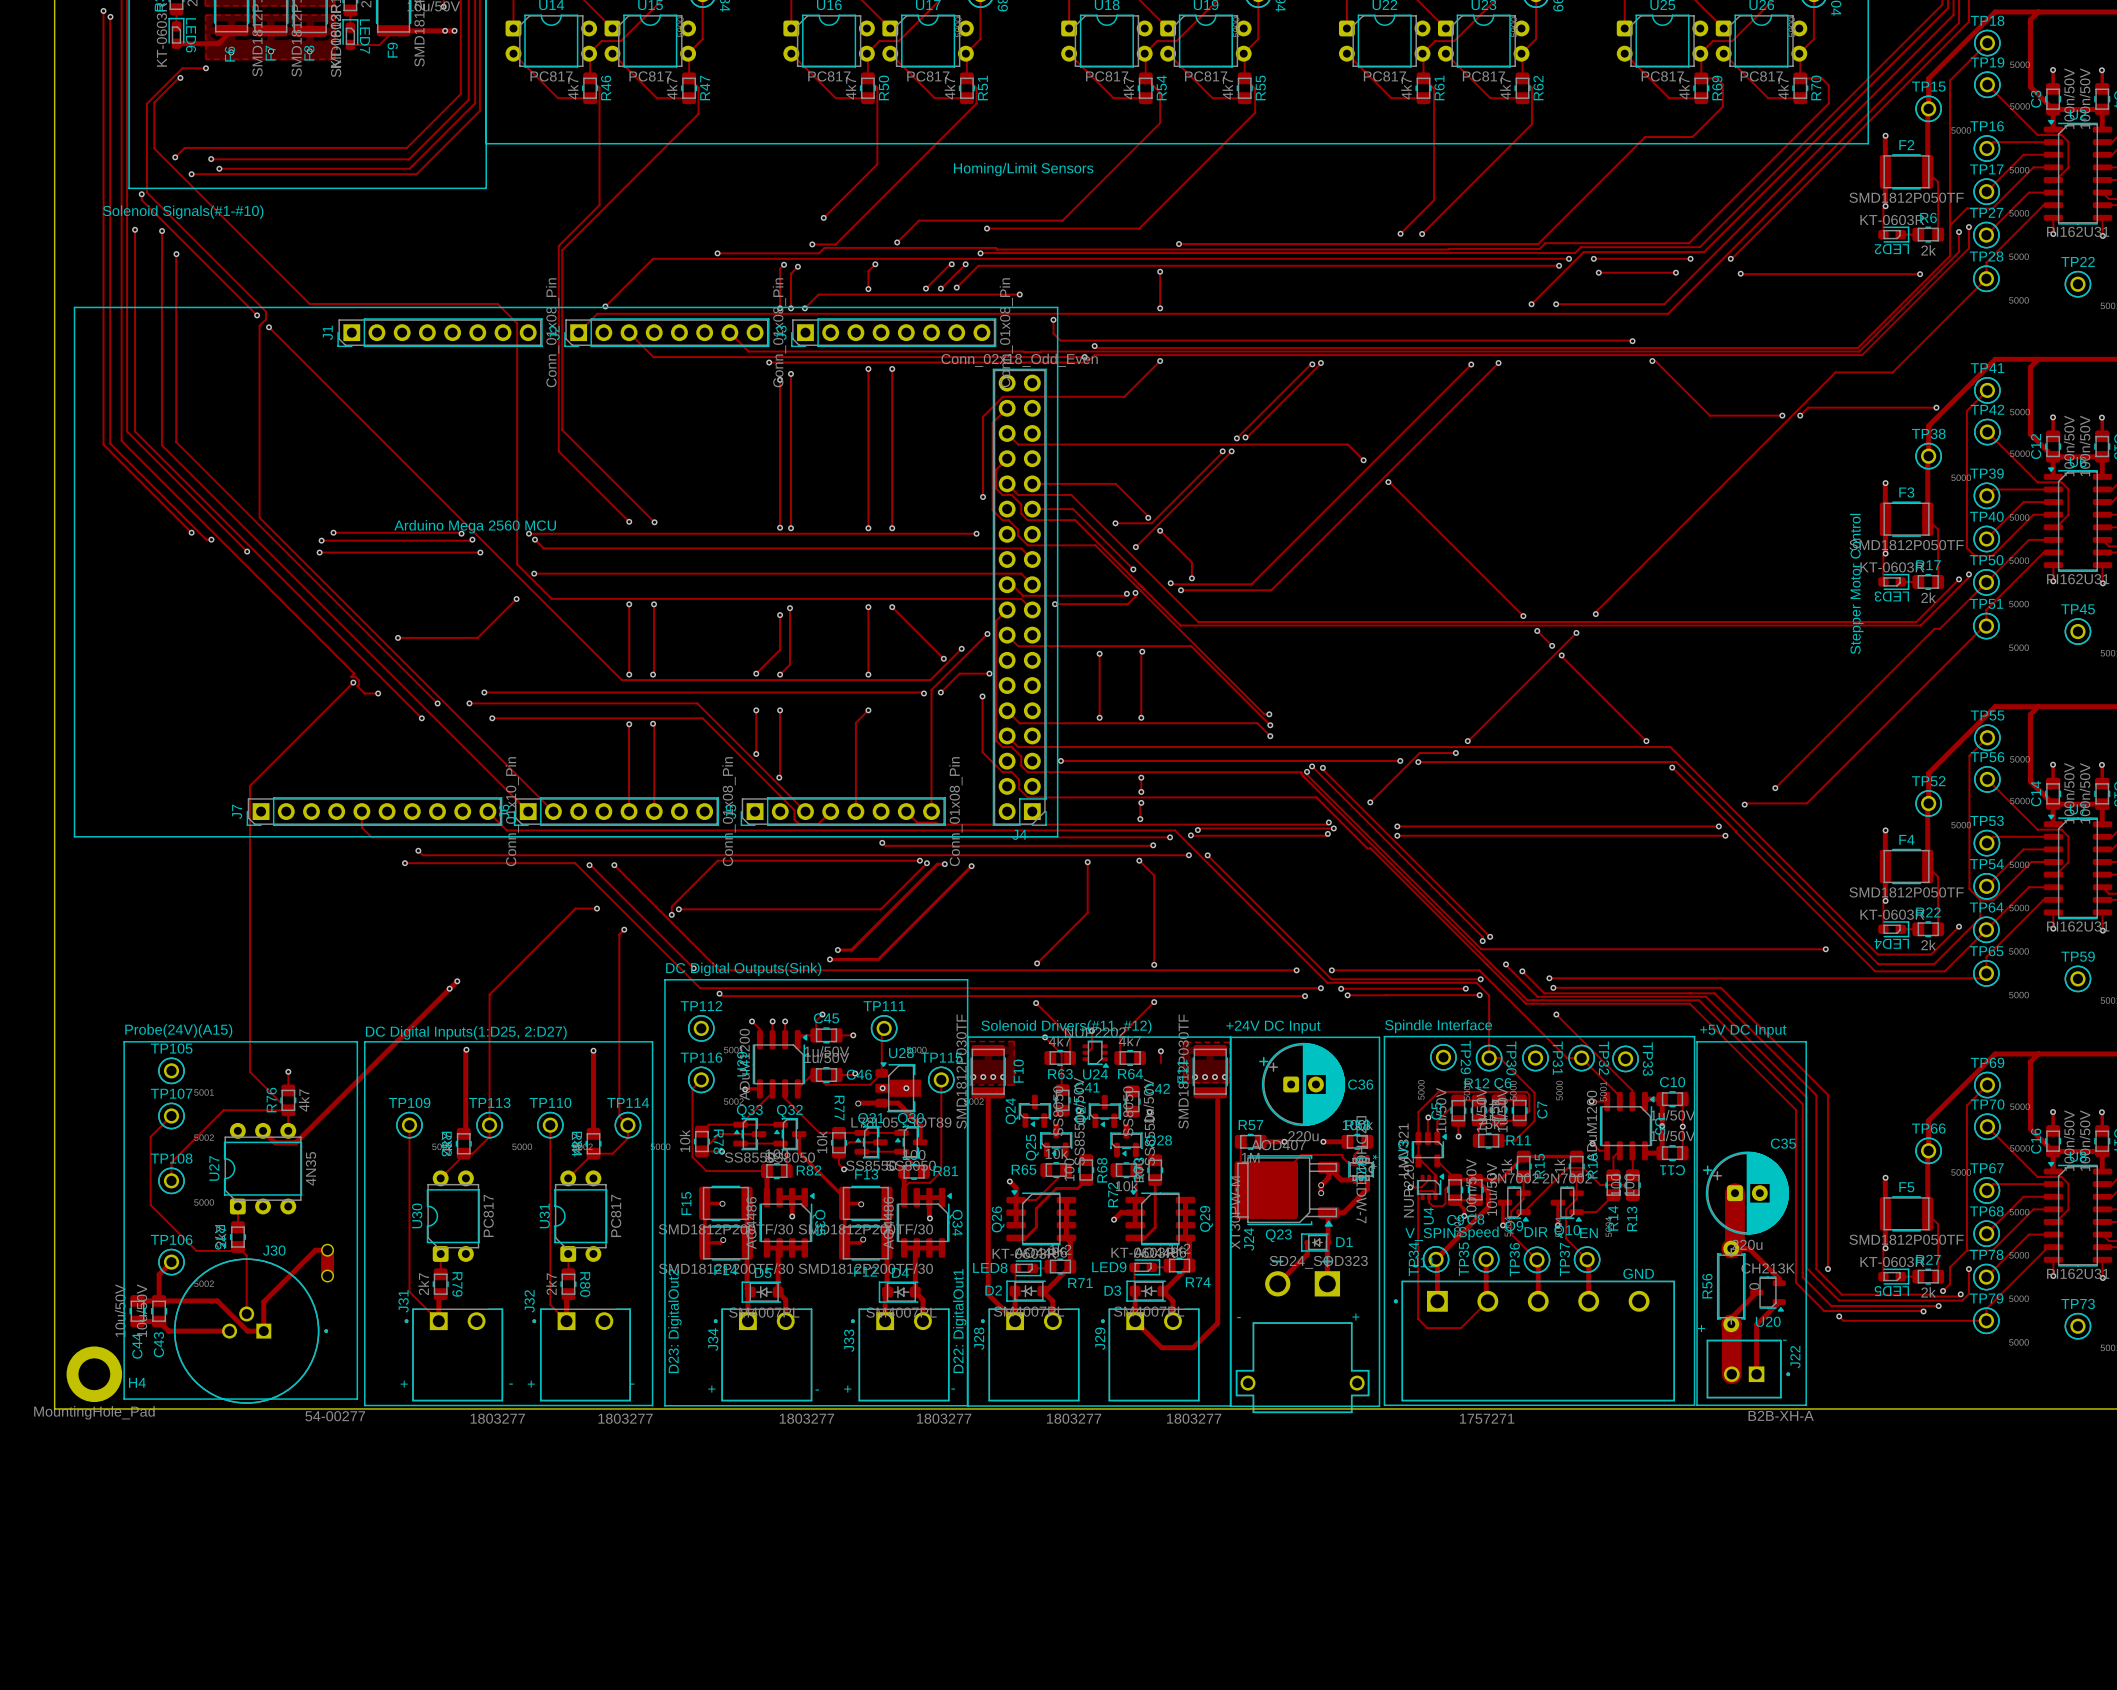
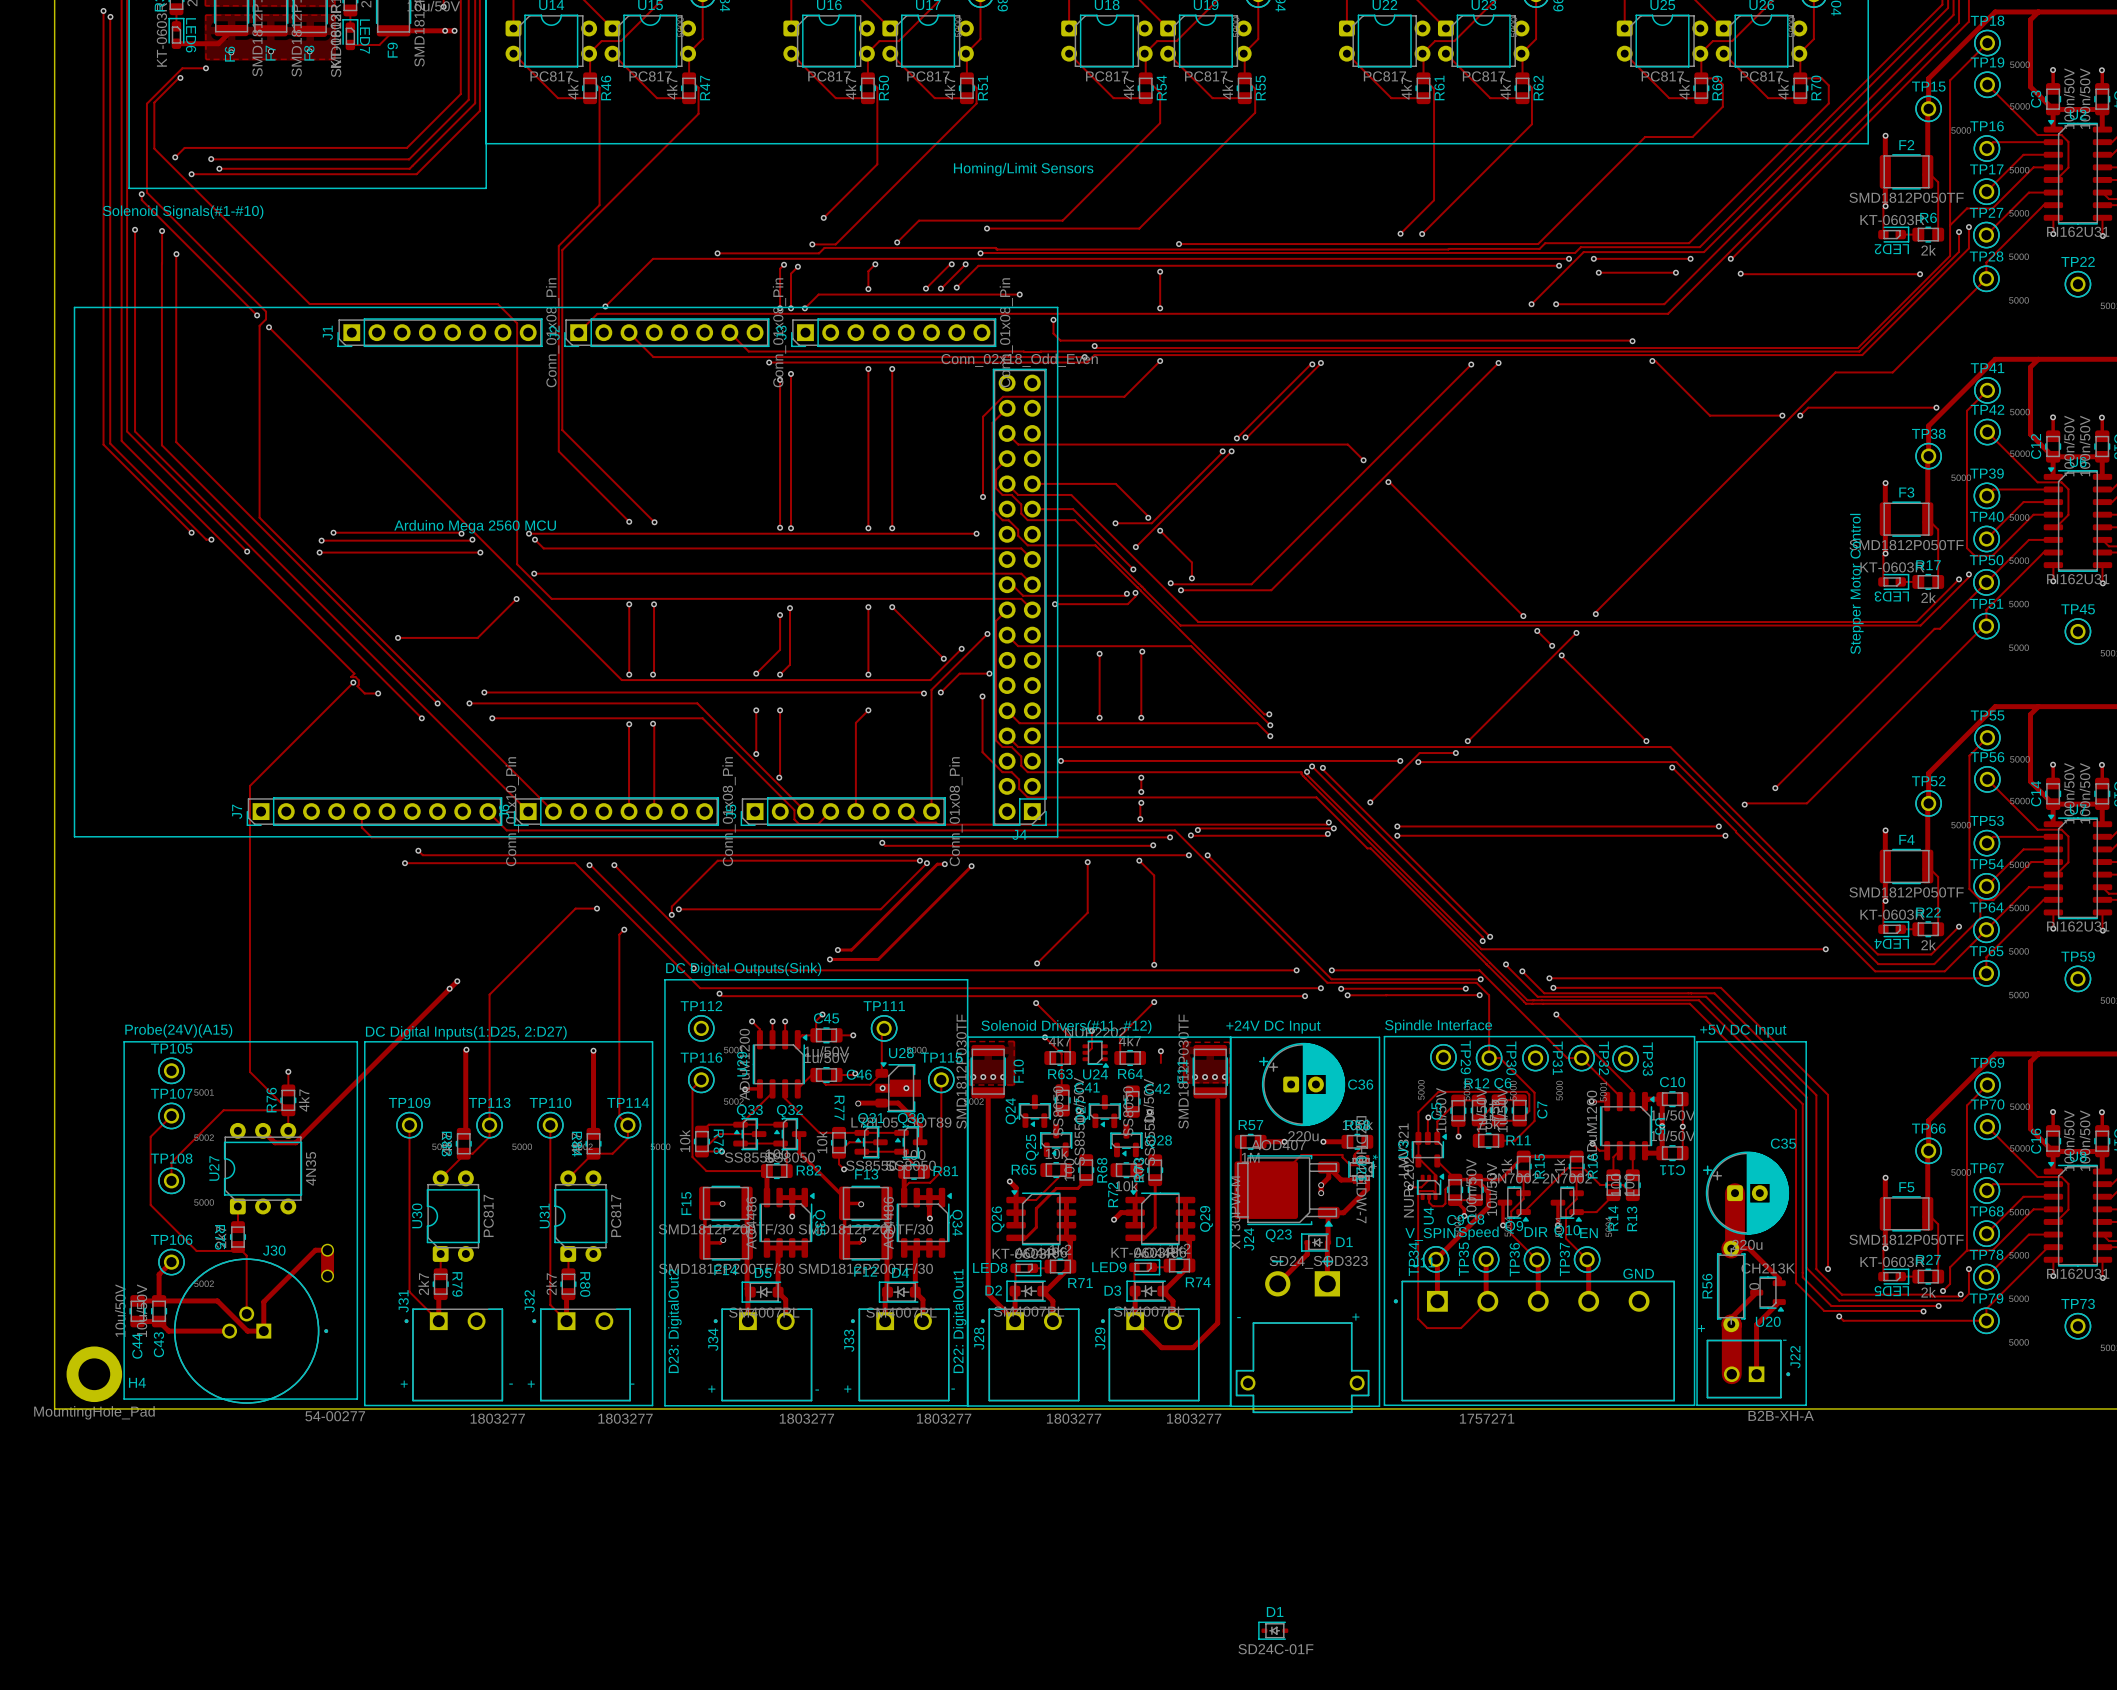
D1: none -> SD24C-01F (1273, 1630)

